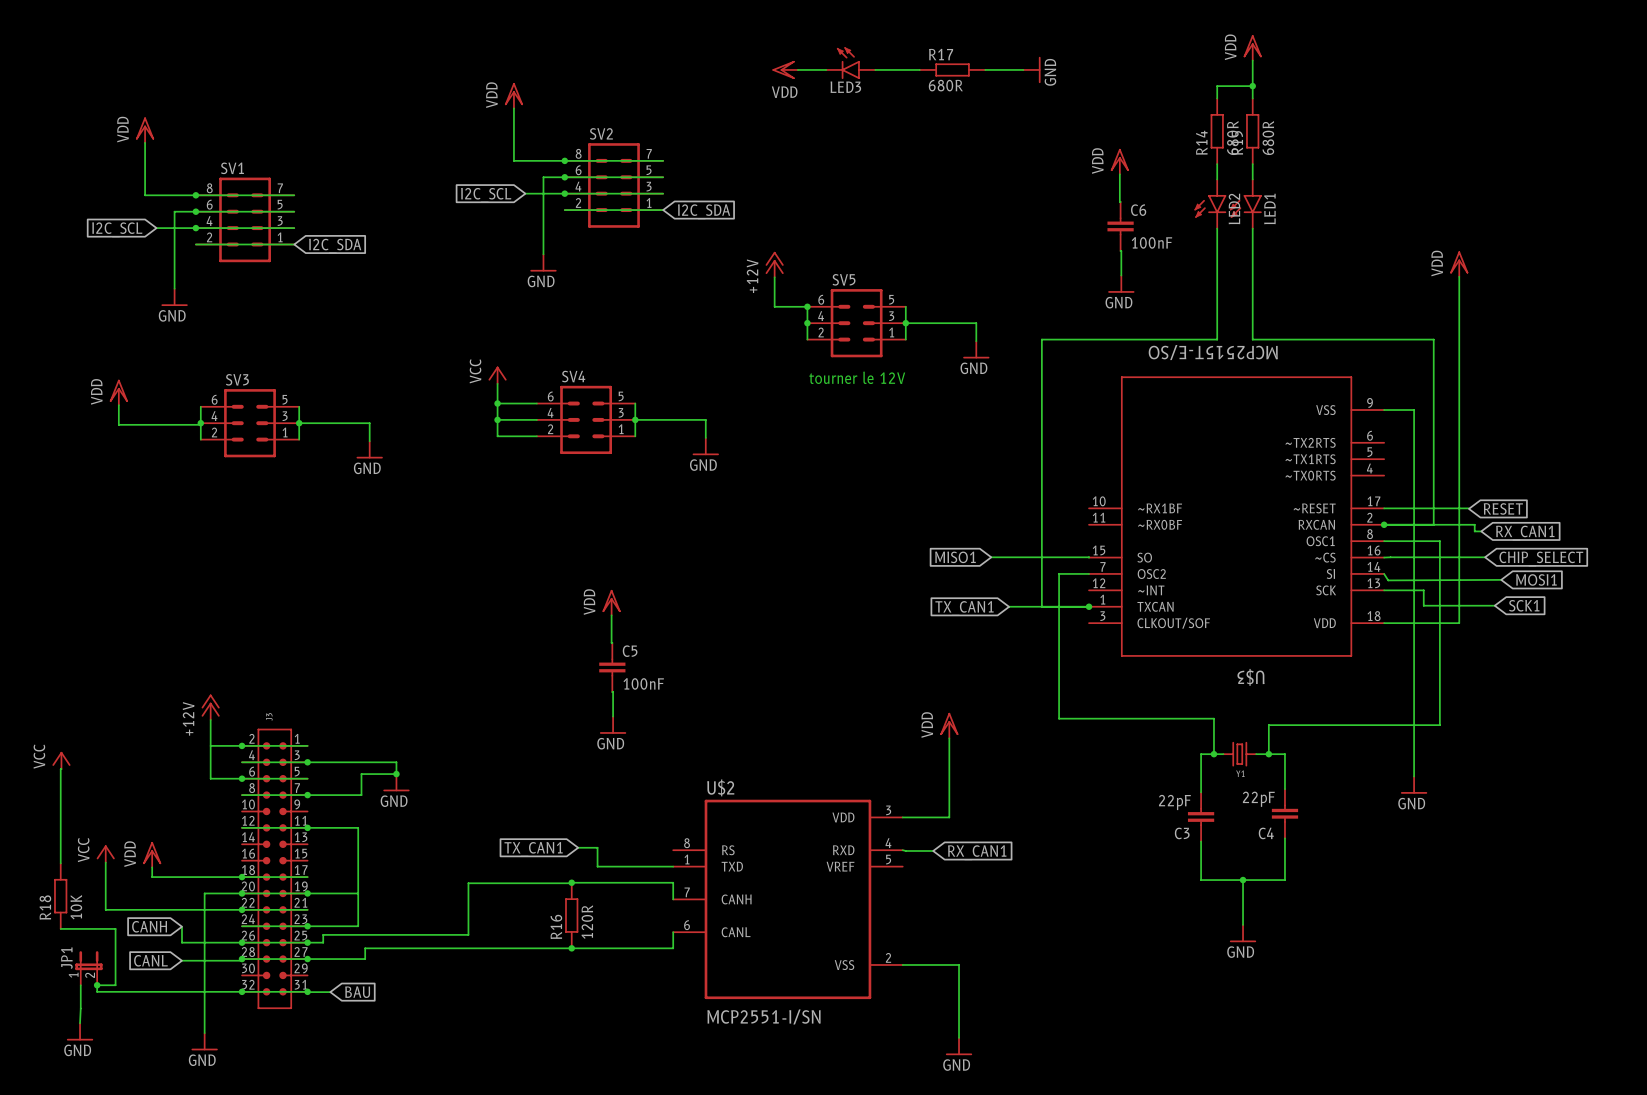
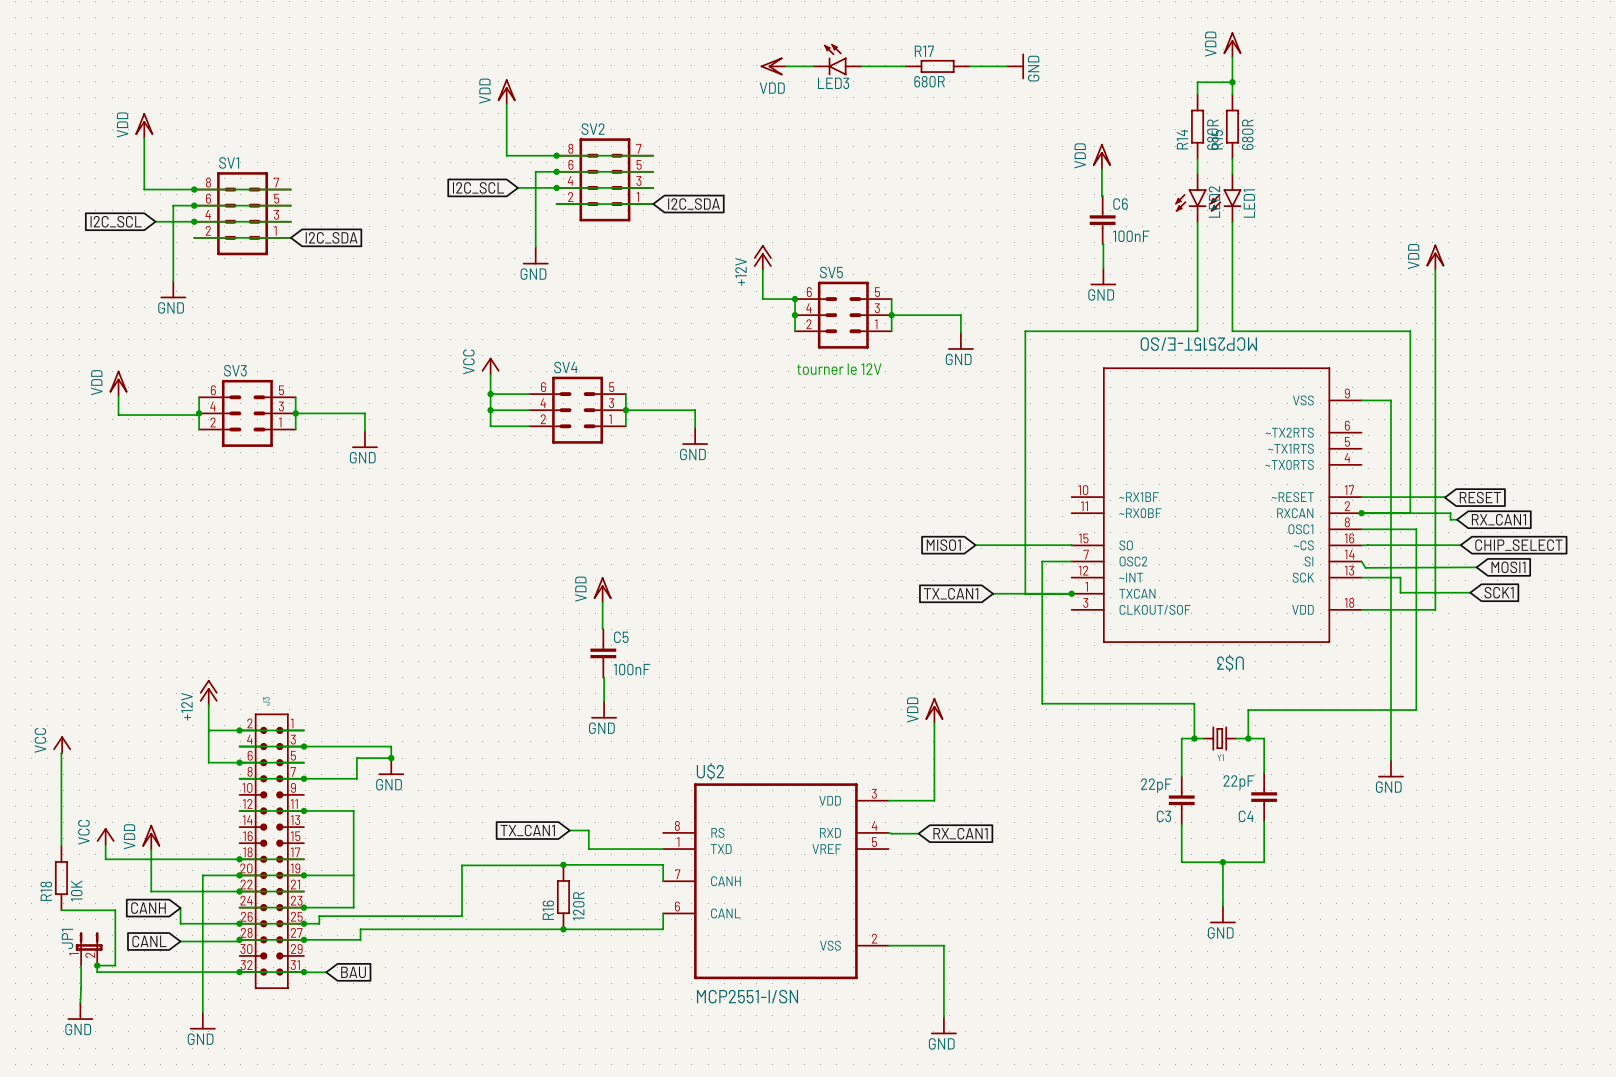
wire: (105, 877) (105, 909) (152, 909) -> (105, 859) (151, 859) (151, 891)

